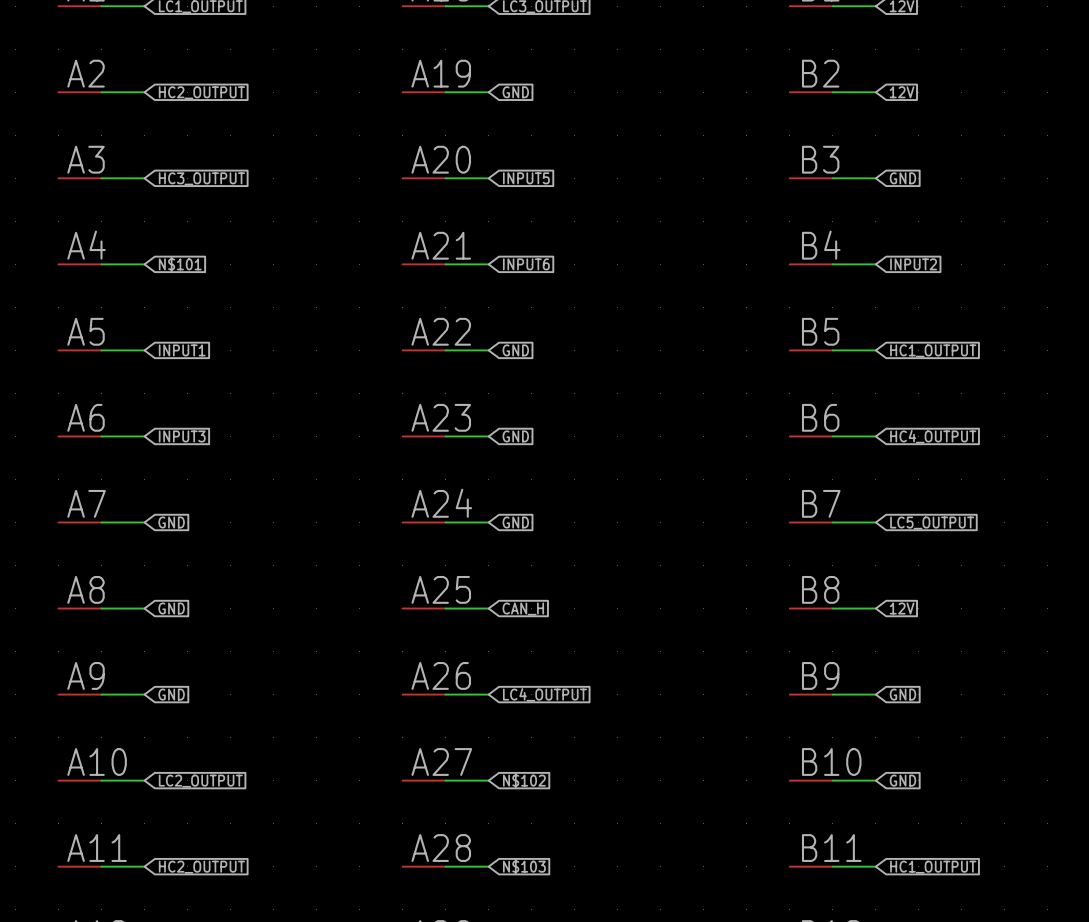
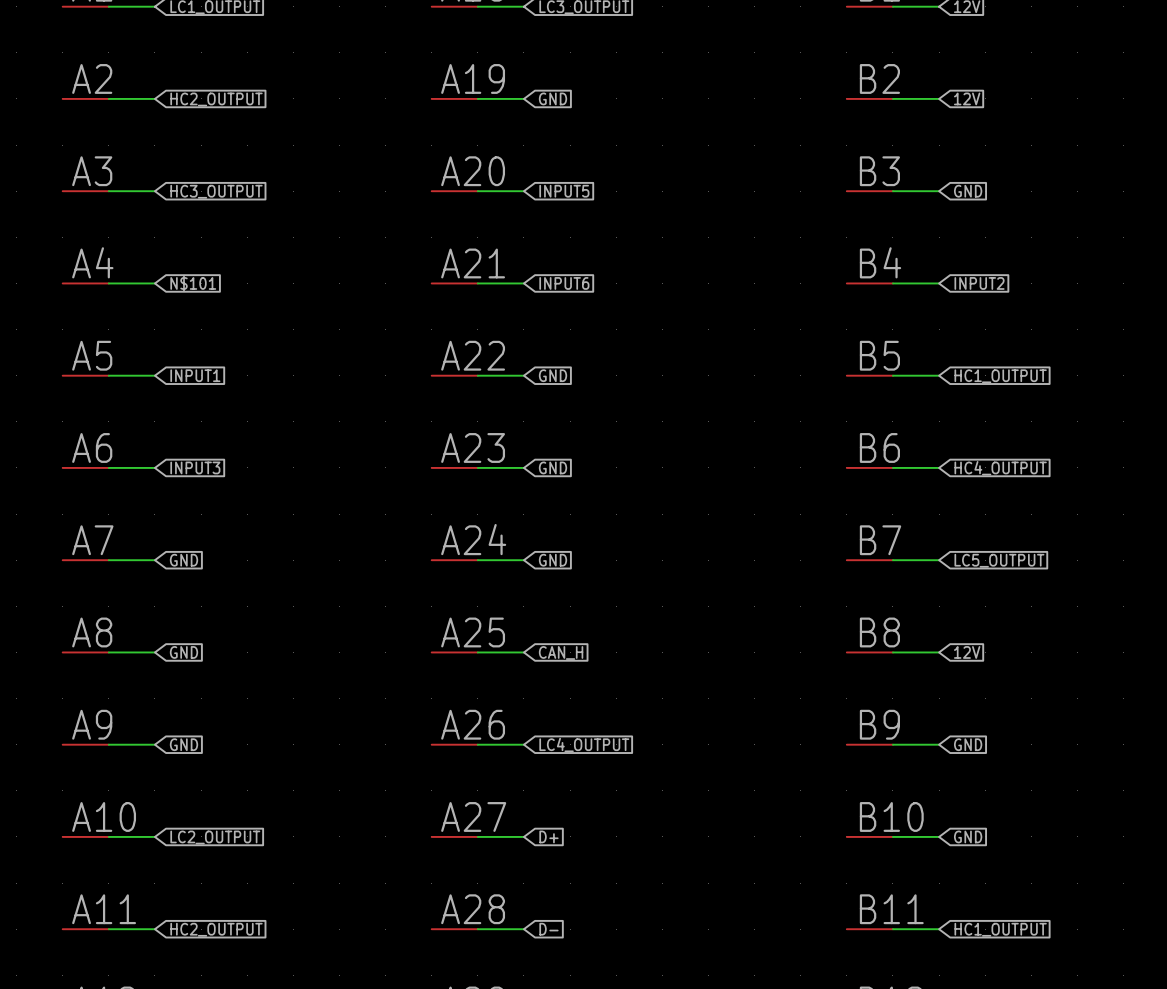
global label: N$102 (524, 780) -> D+ (548, 836)
global label: N$103 (524, 866) -> D- (548, 929)

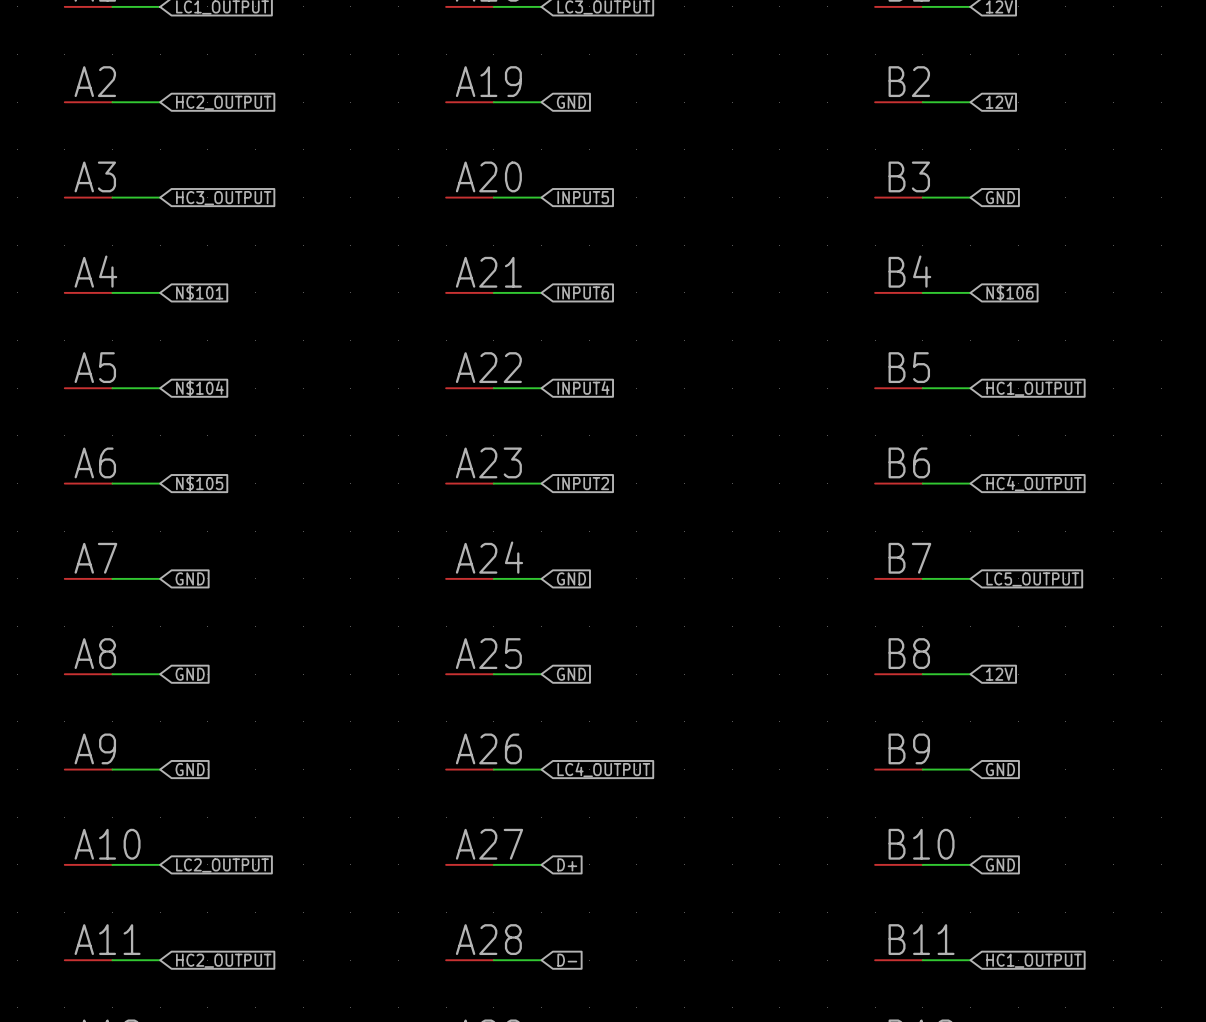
global label: INPUT2 (979, 283) -> N$106 (1010, 292)
global label: INPUT1 (195, 375) -> N$104 (199, 388)
global label: GND (553, 375) -> INPUT4 (583, 387)
global label: INPUT3 (195, 467) -> N$105 (199, 483)
global label: GND (553, 467) -> INPUT2 (583, 483)
global label: CAN_H (561, 652) -> GND (571, 674)

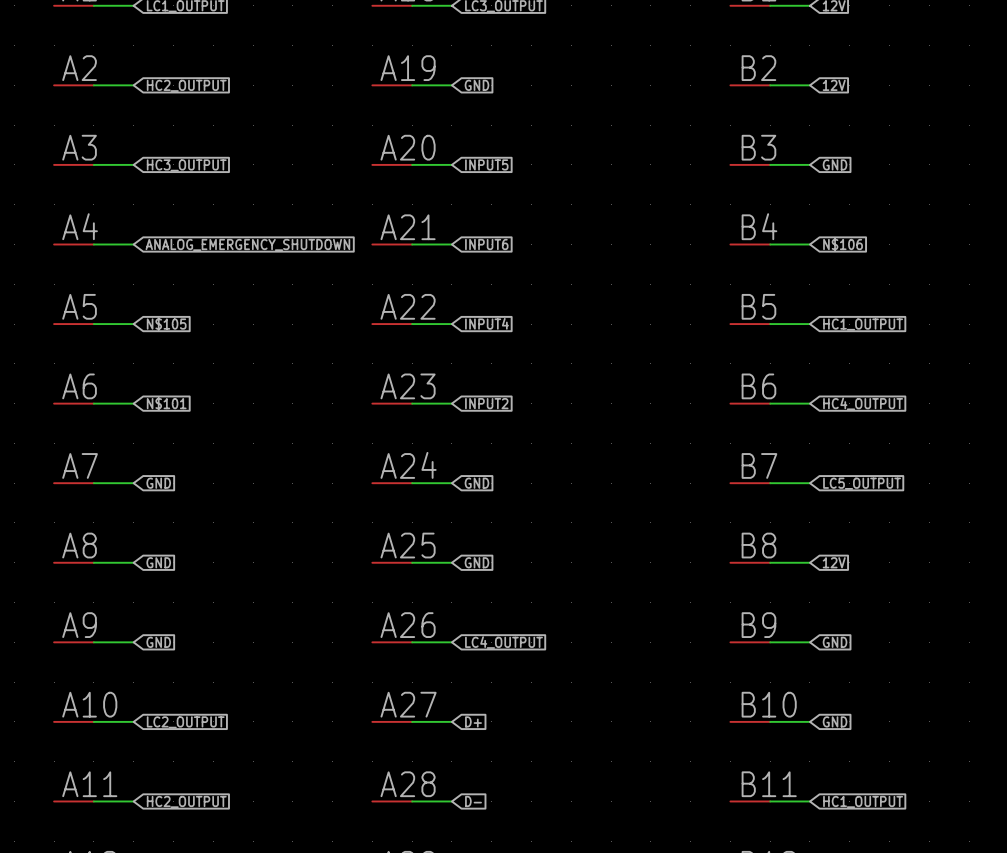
global label: N$101 (199, 292) -> ANALOG_EMERGENCY_SHUTDOWN (247, 244)
global label: N$104 (199, 388) -> N$105 (166, 324)
global label: N$105 (199, 483) -> N$101 (166, 403)

